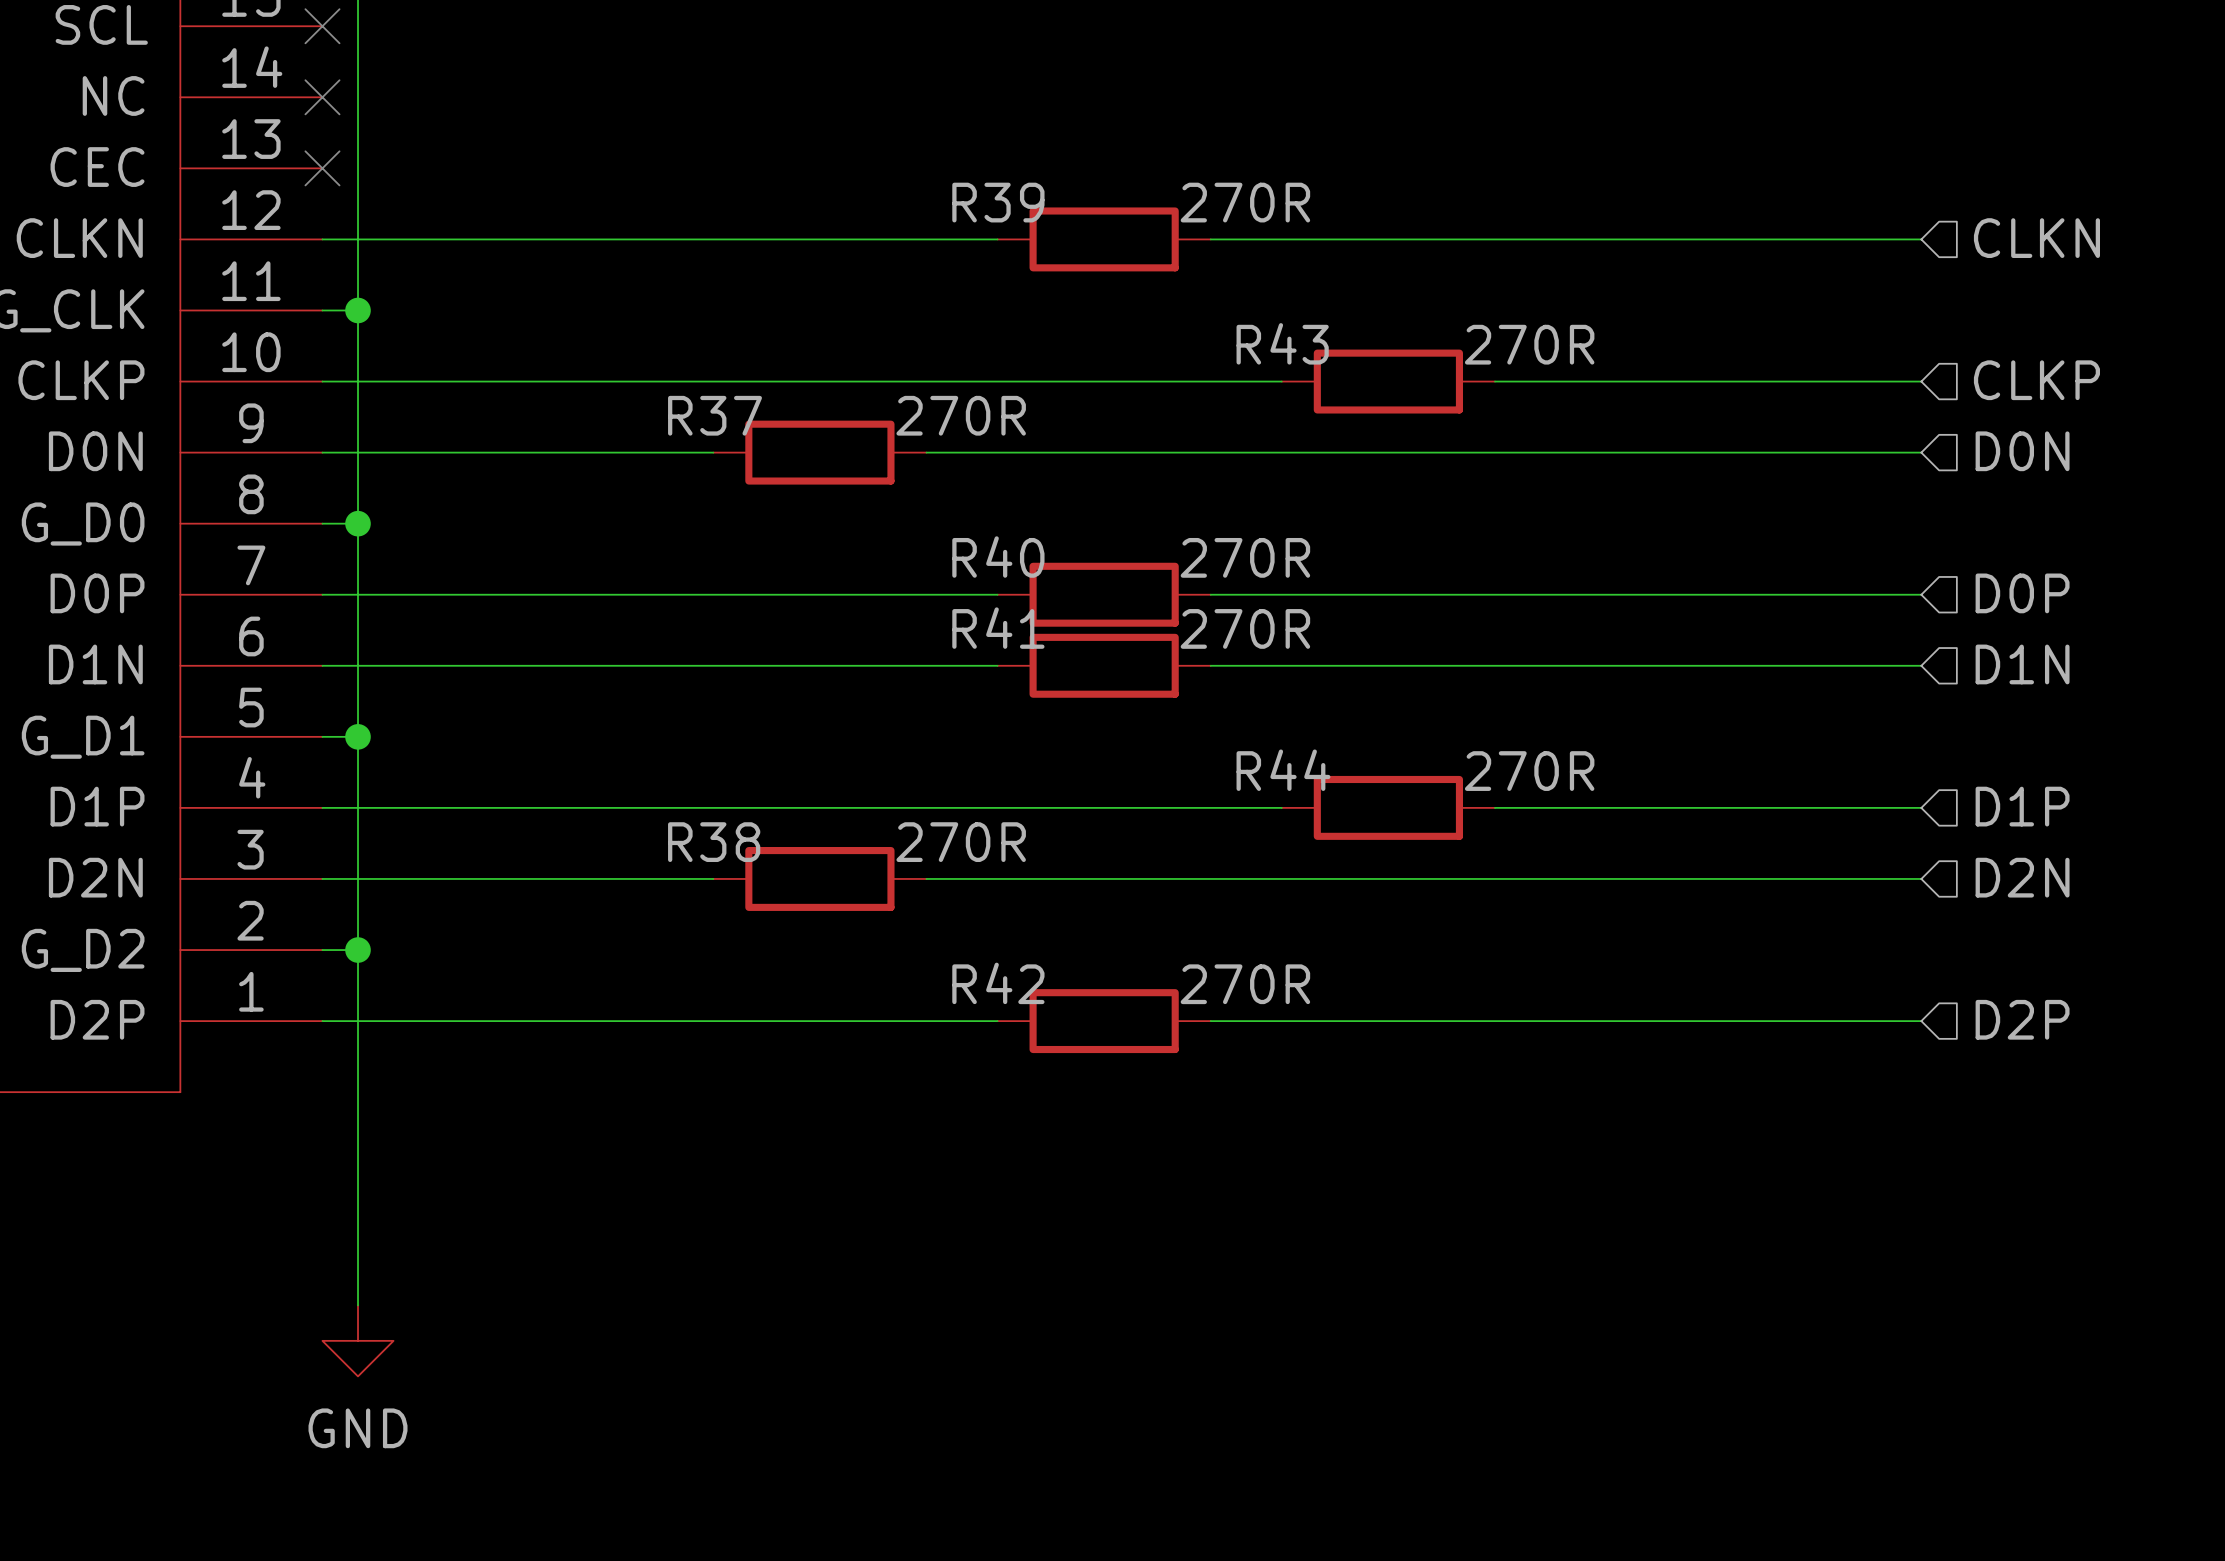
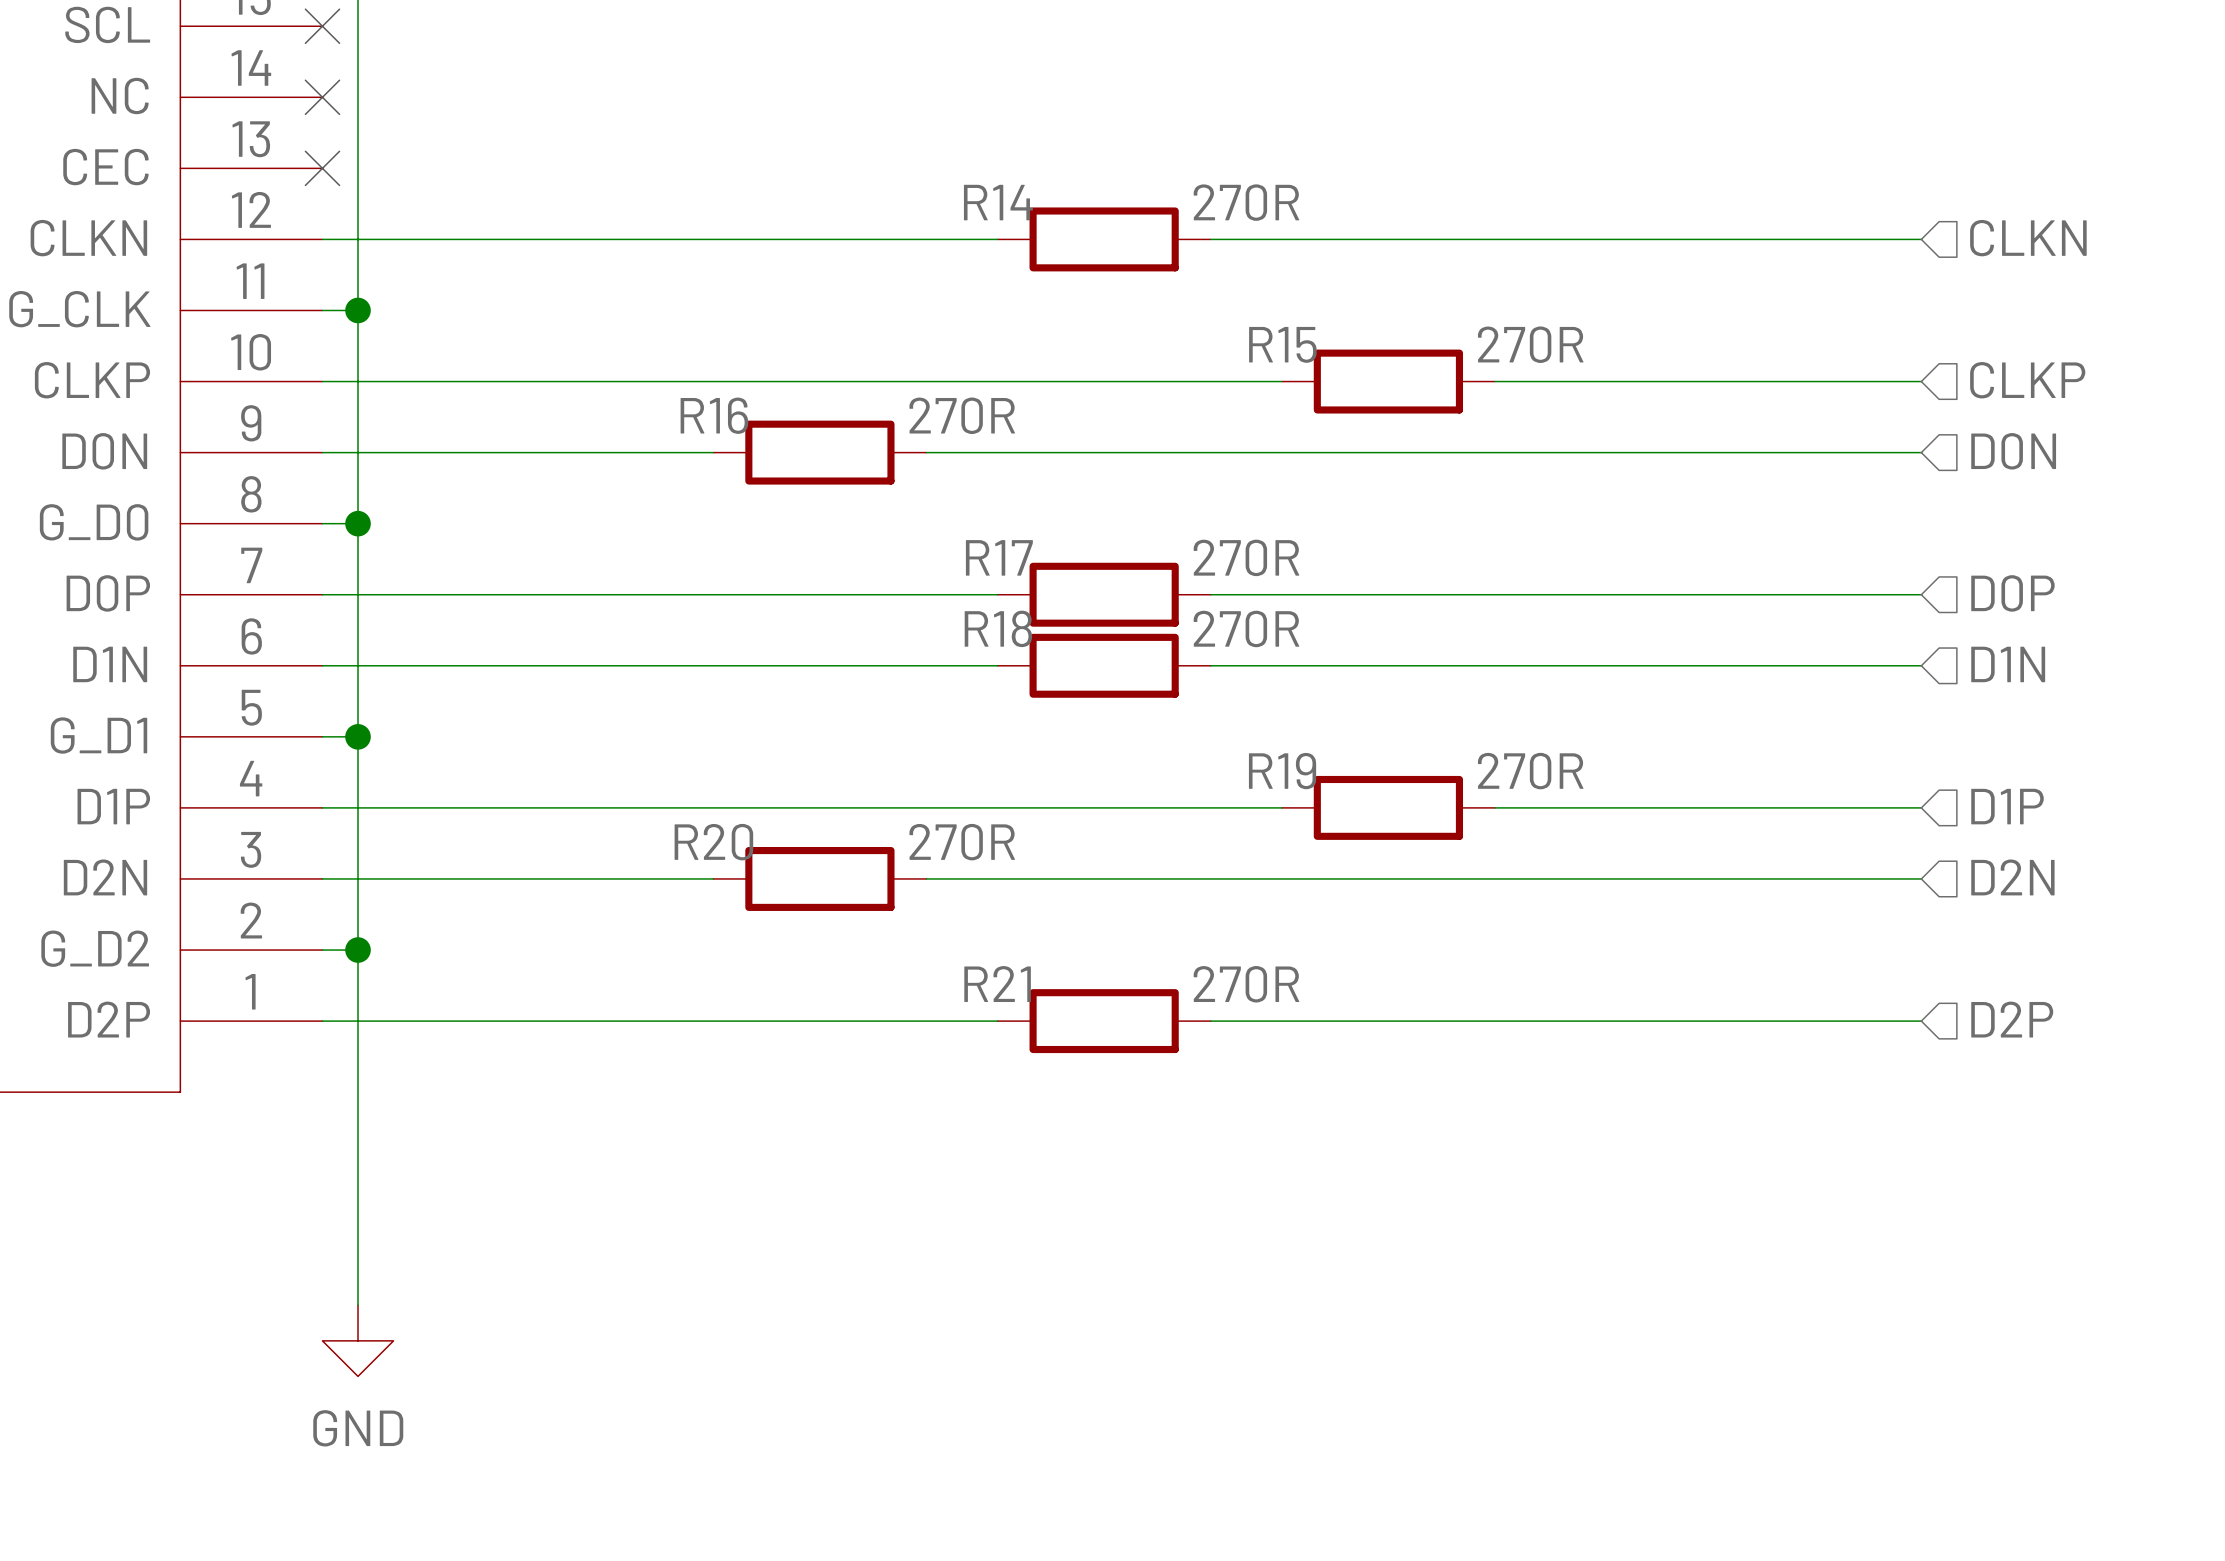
R39 name: R39 (998, 202) -> R14 (998, 202)
R43 name: R43 (1282, 343) -> R15 (1282, 344)
R37 name: R37 (715, 415) -> R16 (714, 415)
R40 name: R40 (998, 557) -> R17 (999, 557)
R41 name: R41 (998, 628) -> R18 (998, 628)
R44 name: R44 (1283, 770) -> R19 (1282, 771)
R38 name: R38 (714, 842) -> R20 (713, 842)
R42 name: R42 (998, 983) -> R21 (997, 984)

